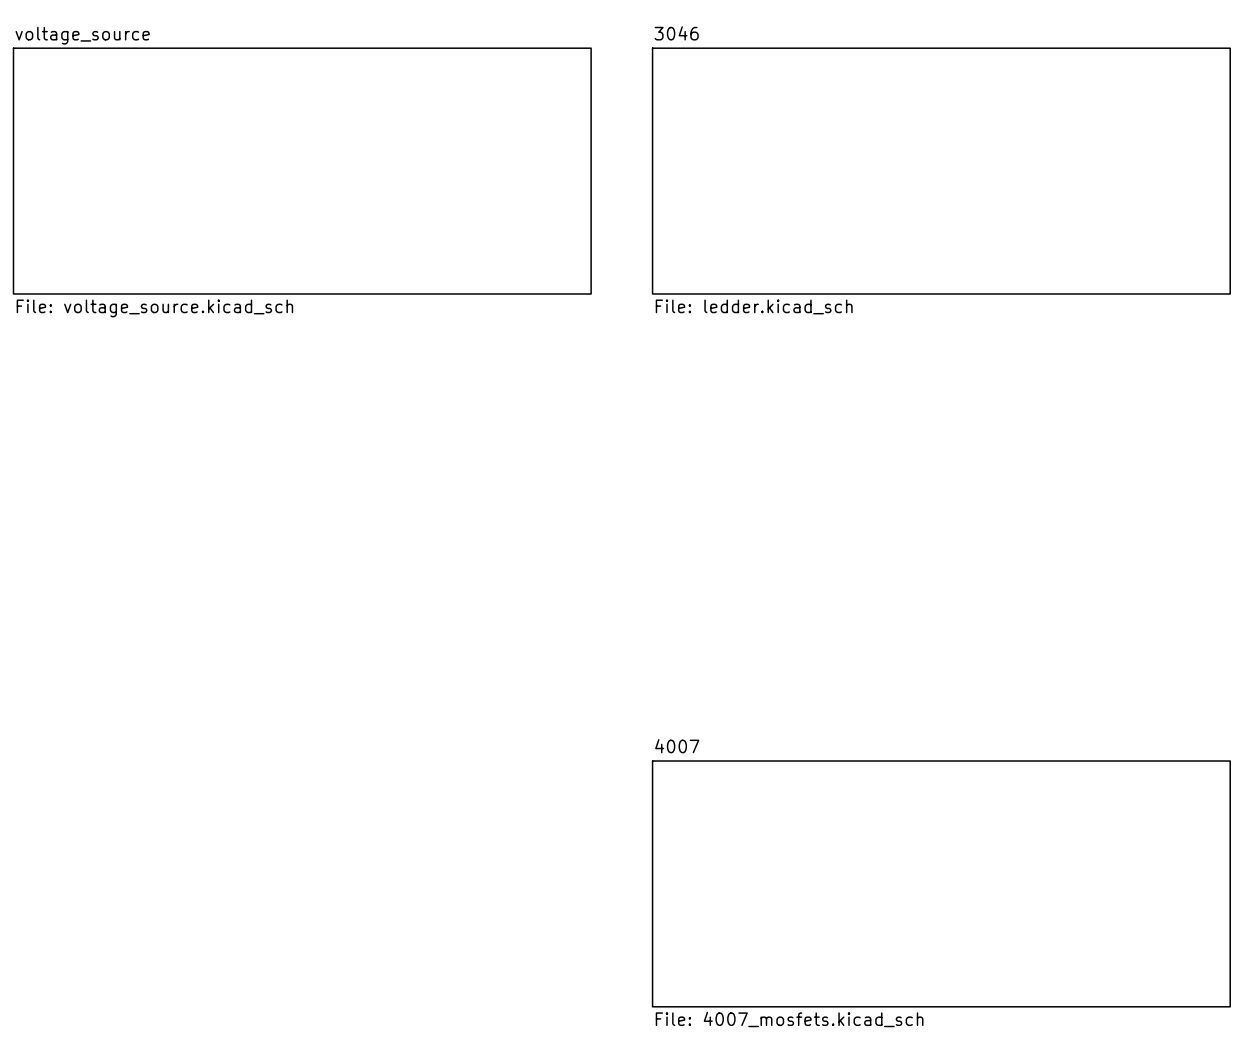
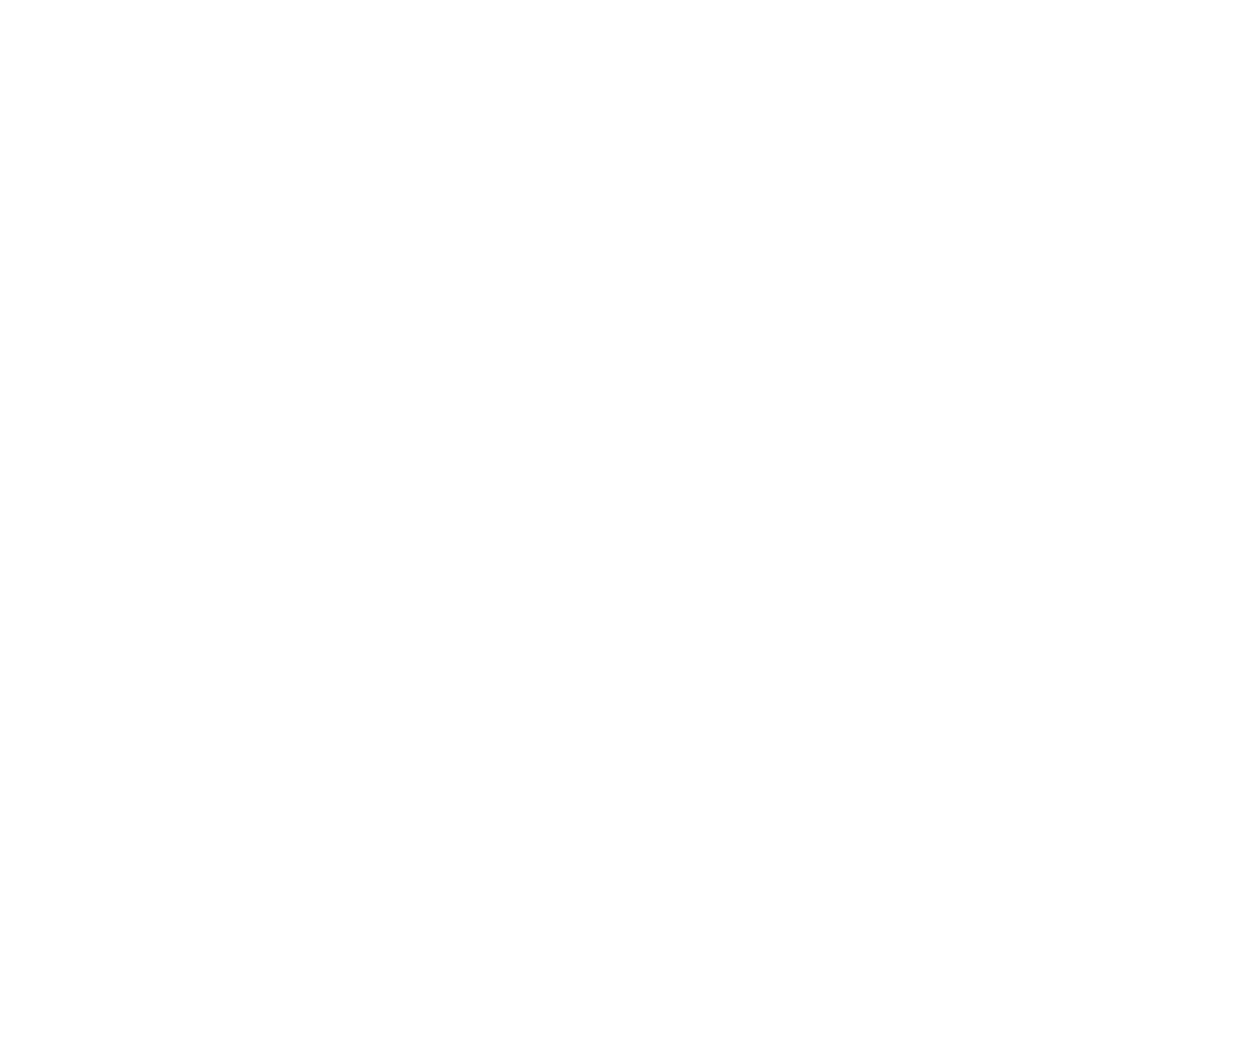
sheet voltage_source: File: voltage_source.kicad_sch (302, 171) -> none
sheet 3046: File: ledder.kicad_sch (941, 171) -> none
sheet 4007: File: 4007_mosfets.kicad_sch (941, 883) -> none

